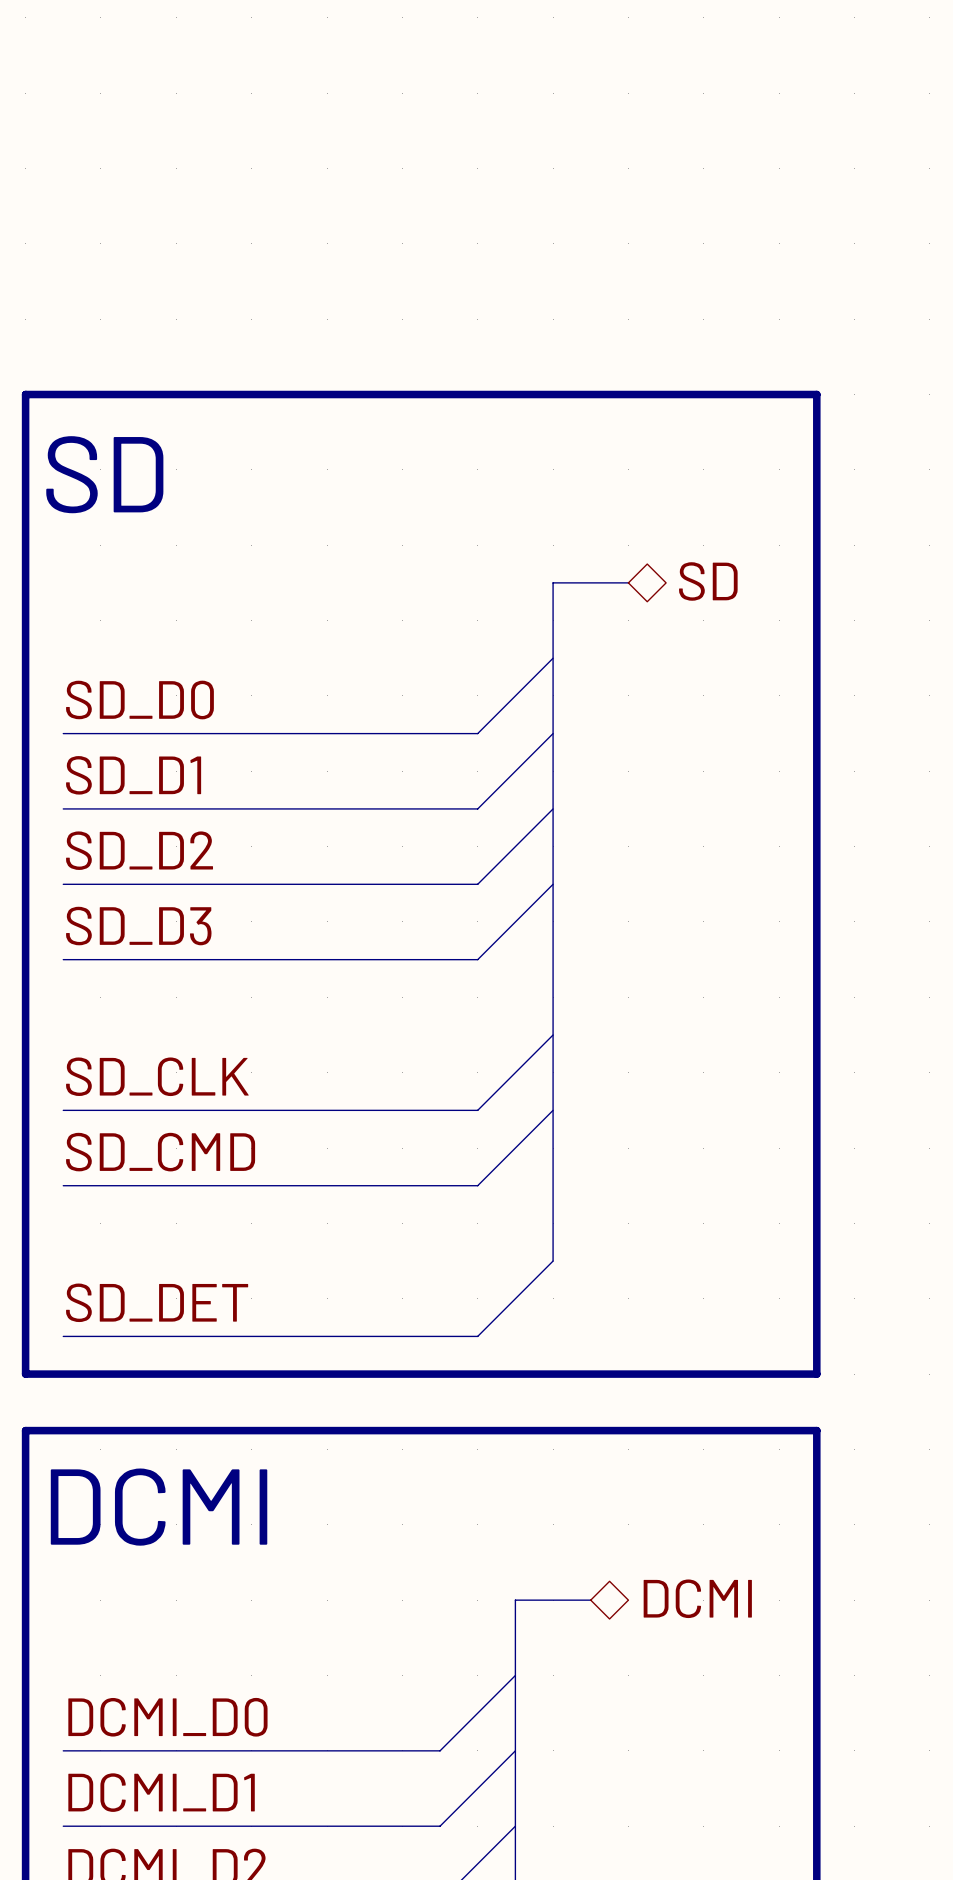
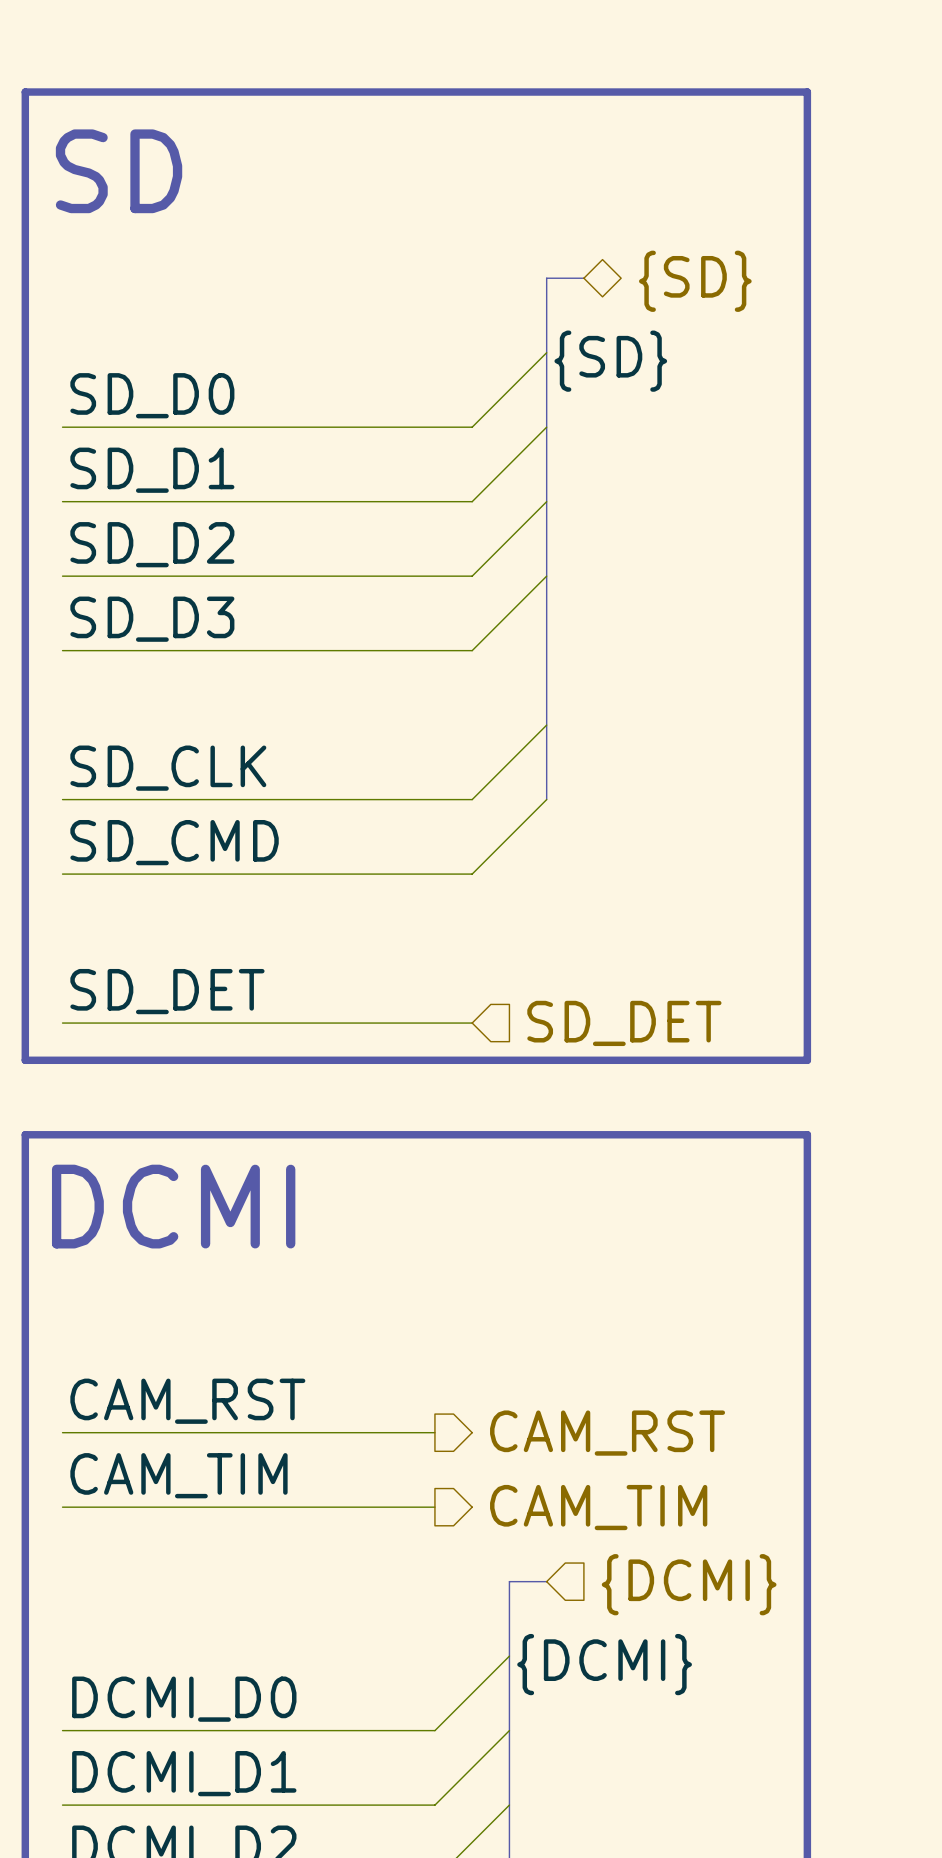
hierarchical label: none -> {SD} (695, 281)
label: none -> {SD} (610, 361)
line: (25, 394) (816, 394) -> (25, 389) (25, 92) (807, 92) (807, 389)
label: none -> SD_D1 (152, 470)
text position: SD (104, 474) -> SD (119, 171)
label: none -> SD_D2 (152, 544)
hierarchical label: SD (708, 581) -> none
bus: (553, 582) (628, 582) -> (546, 576) (546, 278) (583, 278)
wire: (553, 658) (477, 733) (63, 733) -> (546, 427) (472, 501) (62, 501)
label position: SD_D0 (139, 700) -> SD_D0 (152, 395)
label: SD_D1 (133, 775) -> SD_CLK (168, 768)
bus: (553, 808) (553, 1261) -> none
label: SD_D2 (139, 850) -> SD_CMD (174, 842)
wire: (553, 884) (477, 959) (63, 959) -> (546, 352) (472, 427) (62, 427)
label position: SD_D3 (138, 926) -> SD_D3 (152, 619)
hierarchical label: none -> SD_DET (624, 1023)
wire: none -> (62, 1023) (472, 1023)
wire: (553, 1035) (477, 1110) (63, 1110) -> (546, 501) (472, 576) (62, 576)
line: (25, 1072) (25, 1148) -> (25, 1060) (807, 1060)
line: (816, 1072) (816, 1148) -> (25, 1134) (807, 1134)
label: SD_CLK (157, 1076) -> none
wire: (553, 1110) (477, 1185) (63, 1185) -> (546, 576) (472, 650) (62, 650)
label: SD_CMD (160, 1152) -> none
wire: (553, 1261) (477, 1336) (63, 1336) -> none
label position: SD_DET (157, 1302) -> SD_DET (167, 991)
line: (25, 1374) (816, 1374) -> (25, 1358) (25, 1414)
label: none -> CAM_RST (187, 1401)
line: (25, 1430) (816, 1430) -> (807, 1358) (807, 1414)
hierarchical label: none -> CAM_RST (607, 1433)
wire: none -> (62, 1432) (434, 1432)
label: none -> CAM_TIM (178, 1475)
text position: DCMI (159, 1507) -> DCMI (173, 1206)
hierarchical label: none -> CAM_TIM (598, 1507)
wire: none -> (62, 1507) (434, 1507)
hierarchical label shape: bidirectional (697, 1598) -> input (689, 1584)
hierarchical label: DCMI (697, 1598) -> {DCMI} (689, 1584)
bus: (553, 1600) (590, 1600) -> none
label: none -> {DCMI} (604, 1664)

